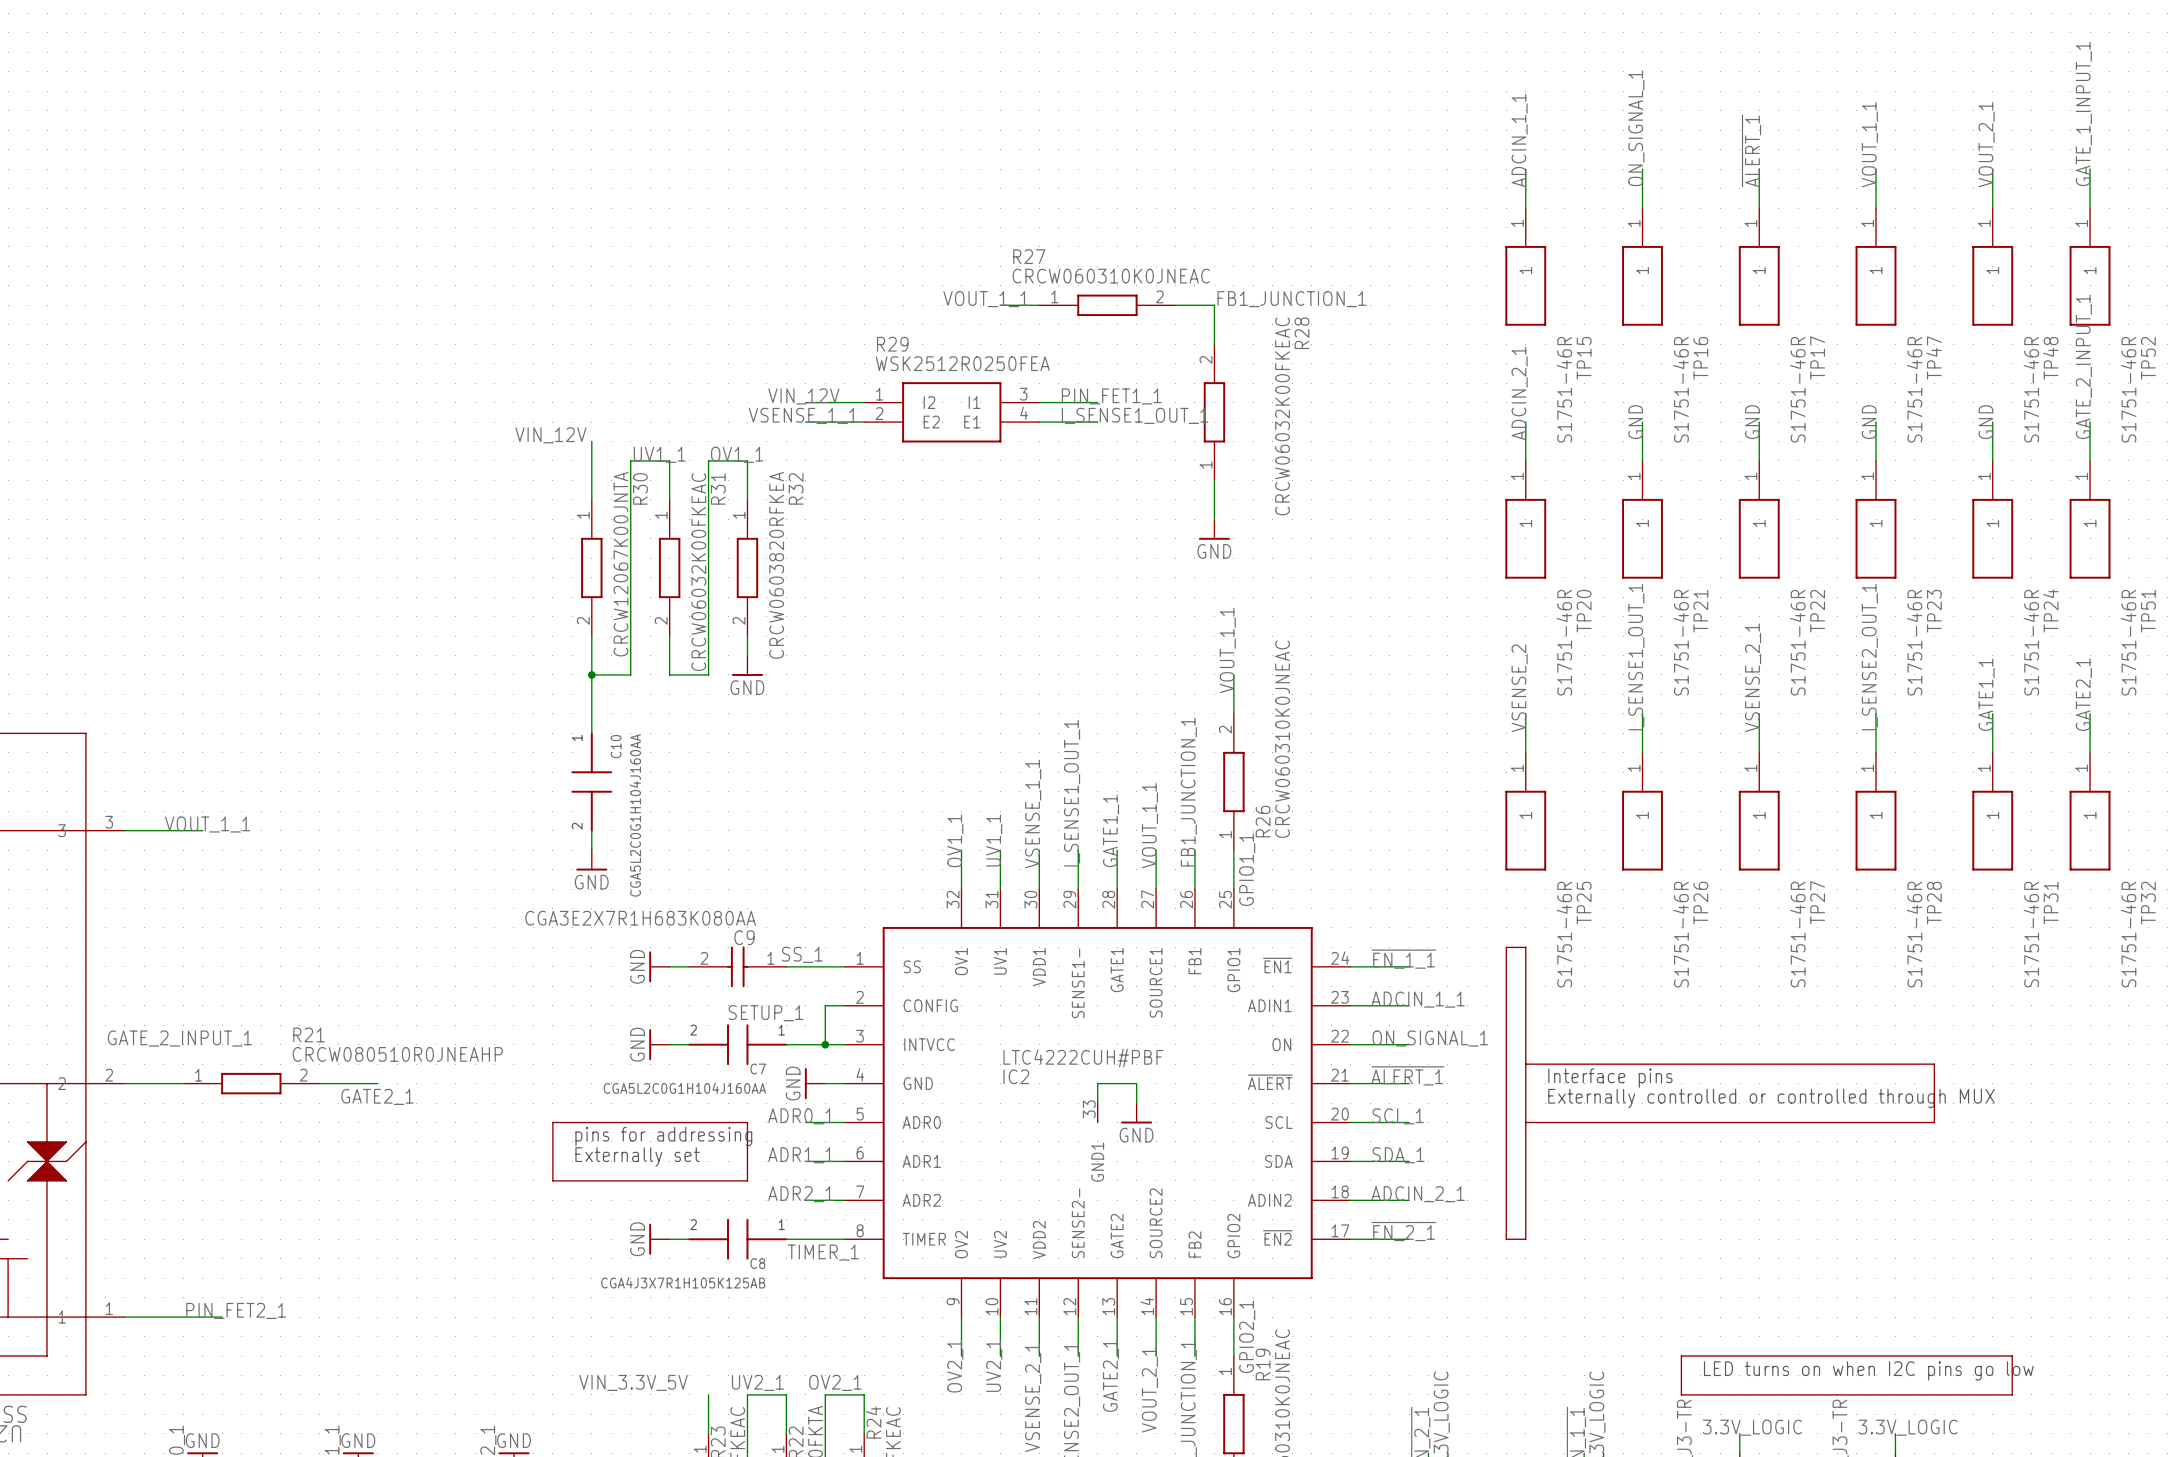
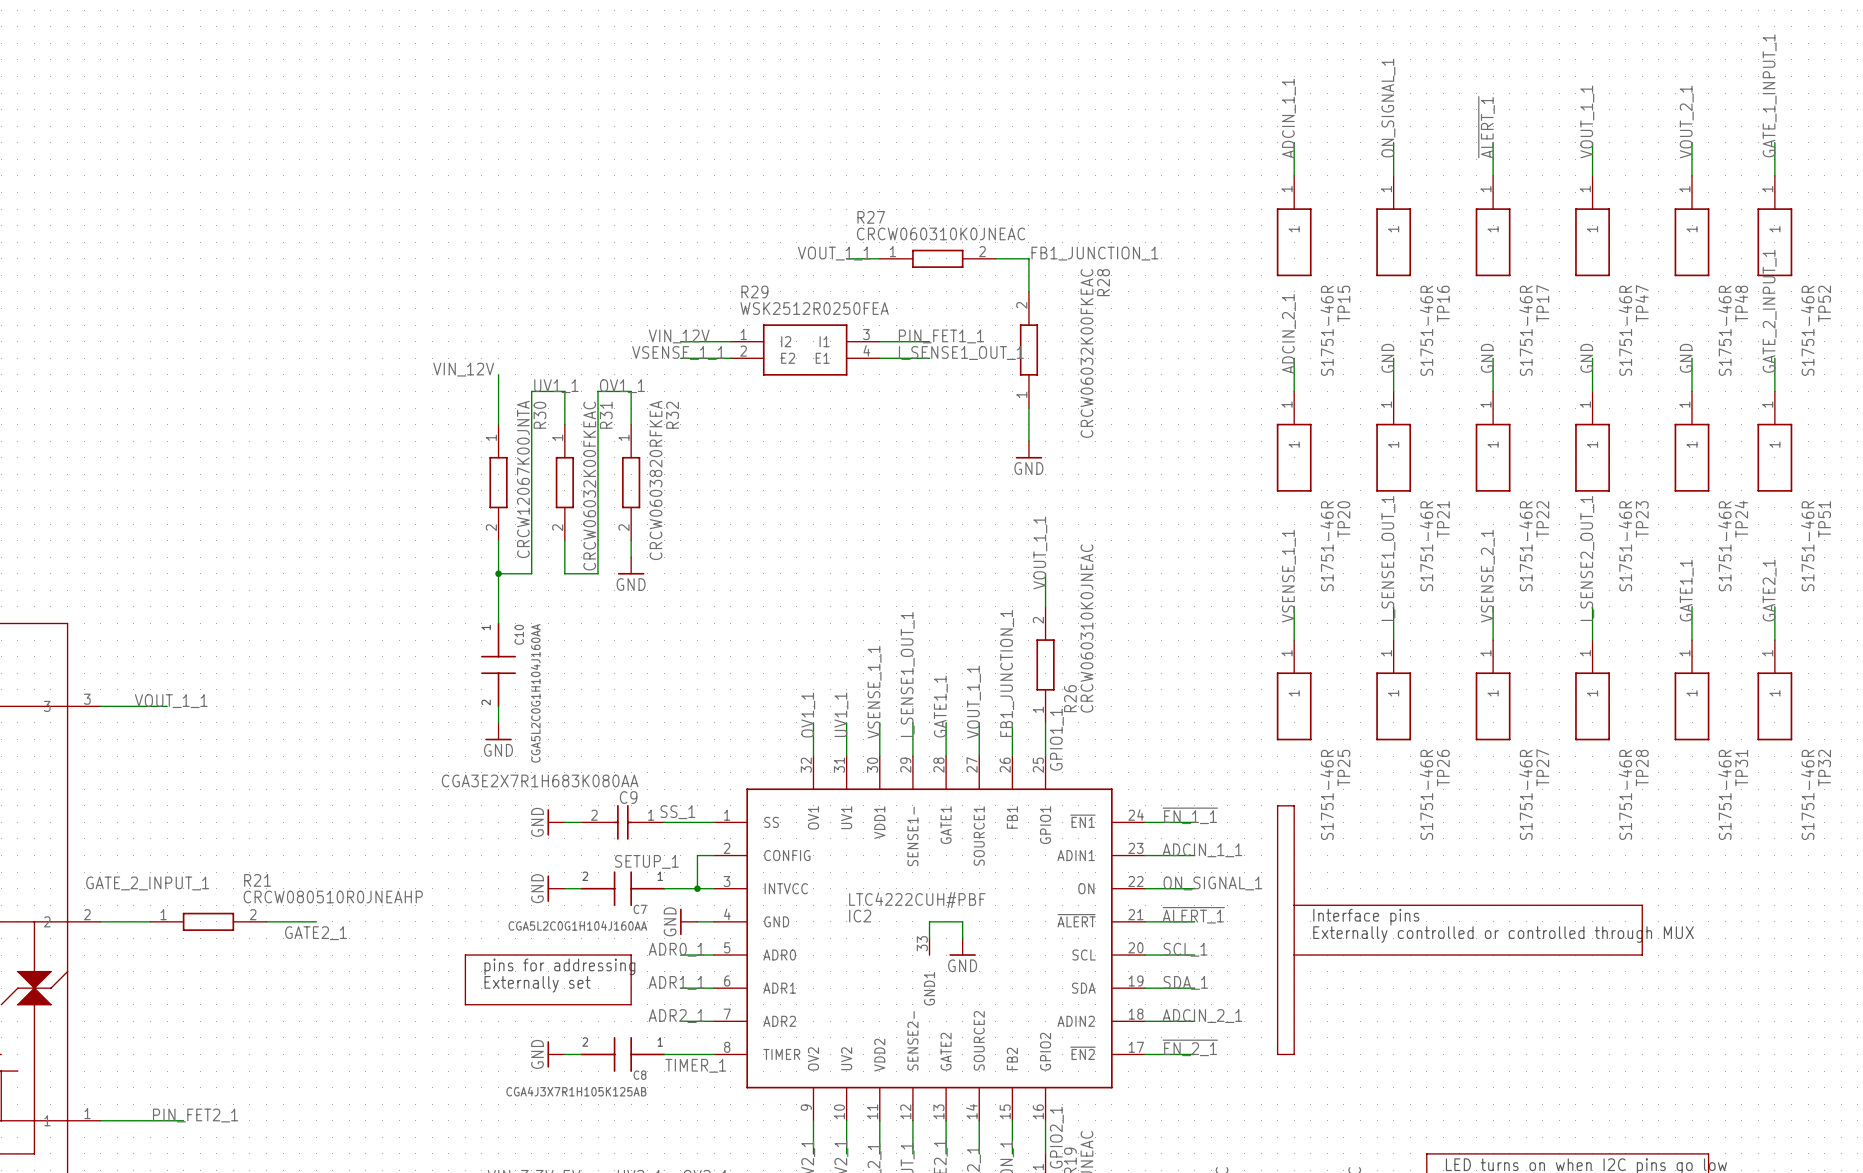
label: VSENSE_2 (1519, 688) -> VSENSE_1_1 (1288, 576)

